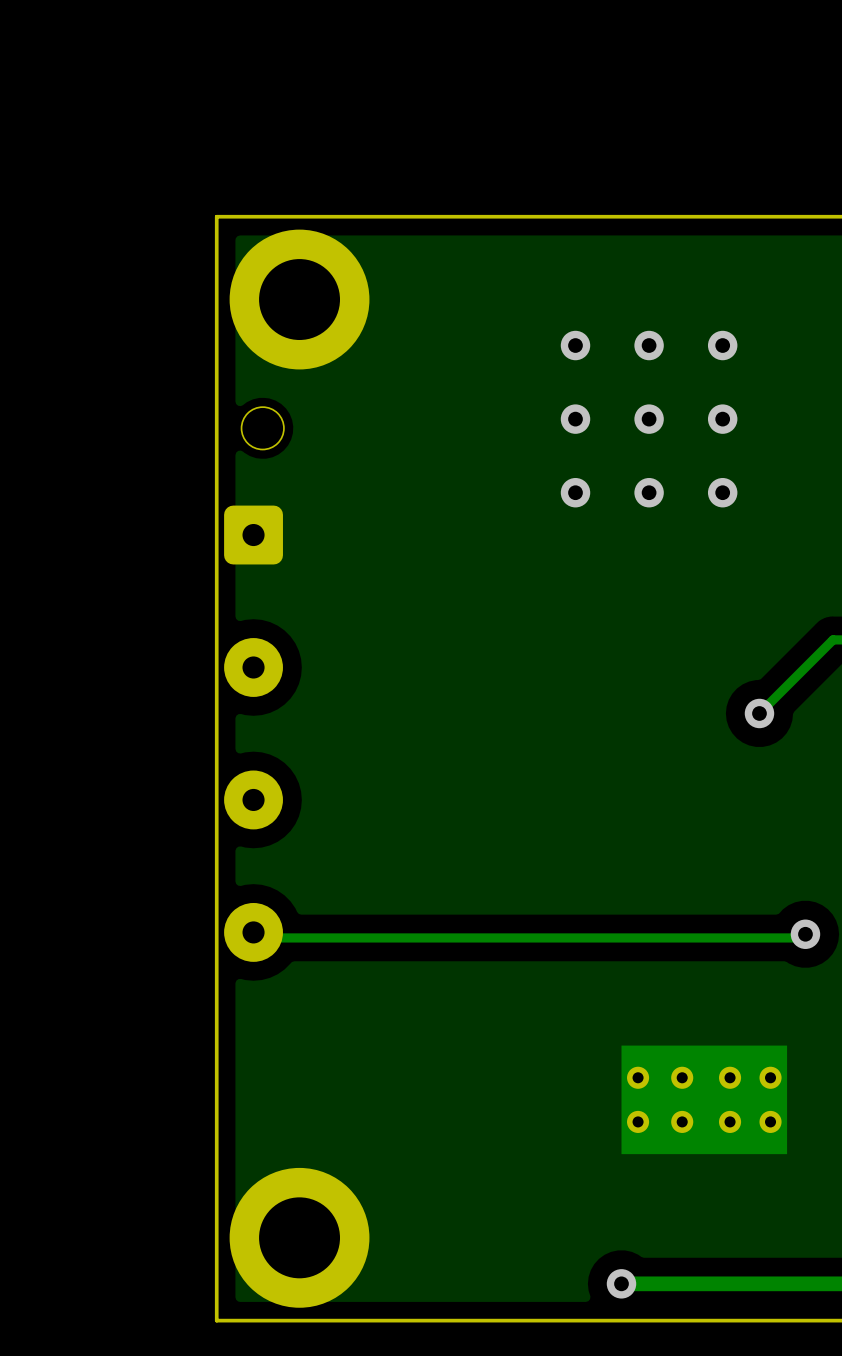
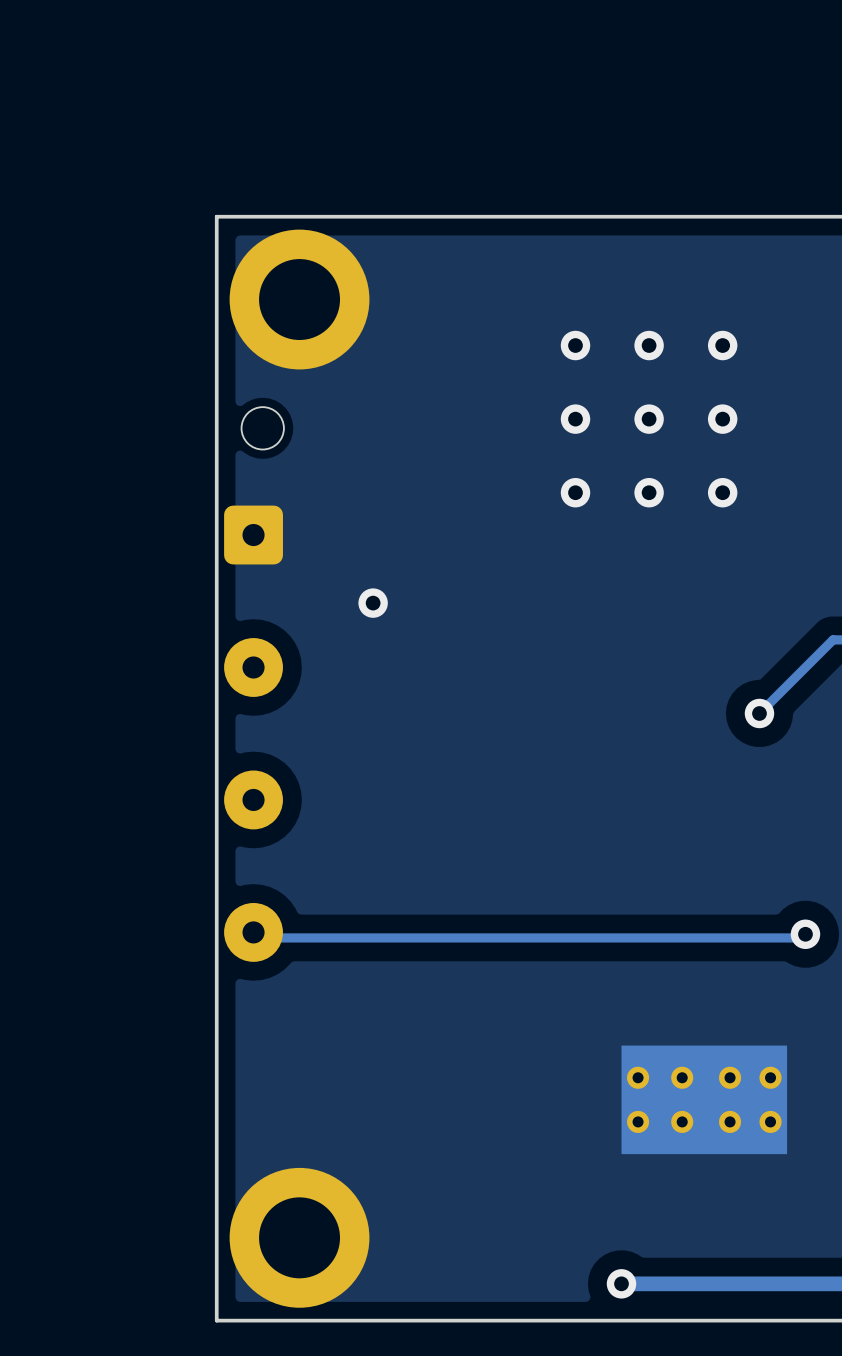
via: none -> (373, 603)

